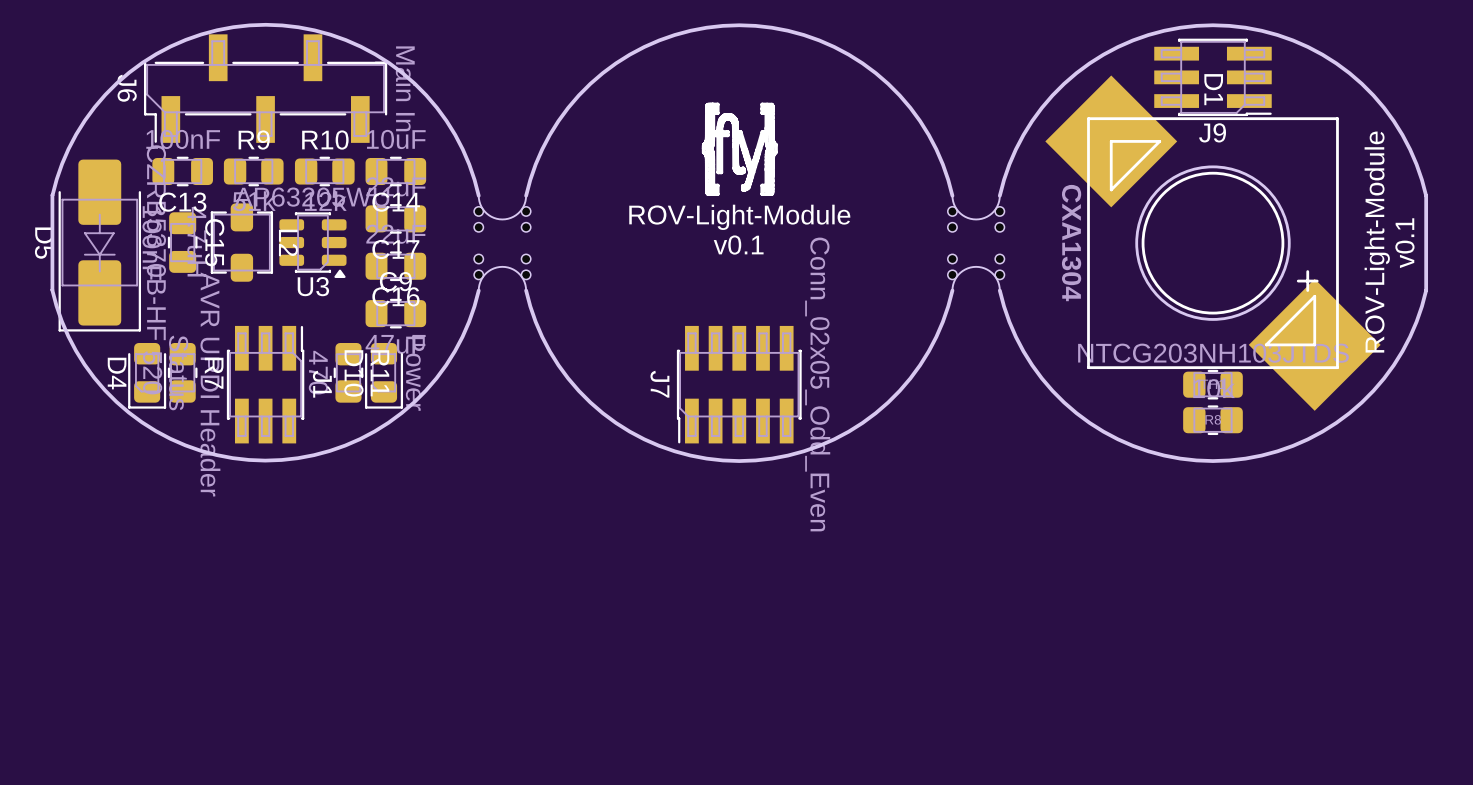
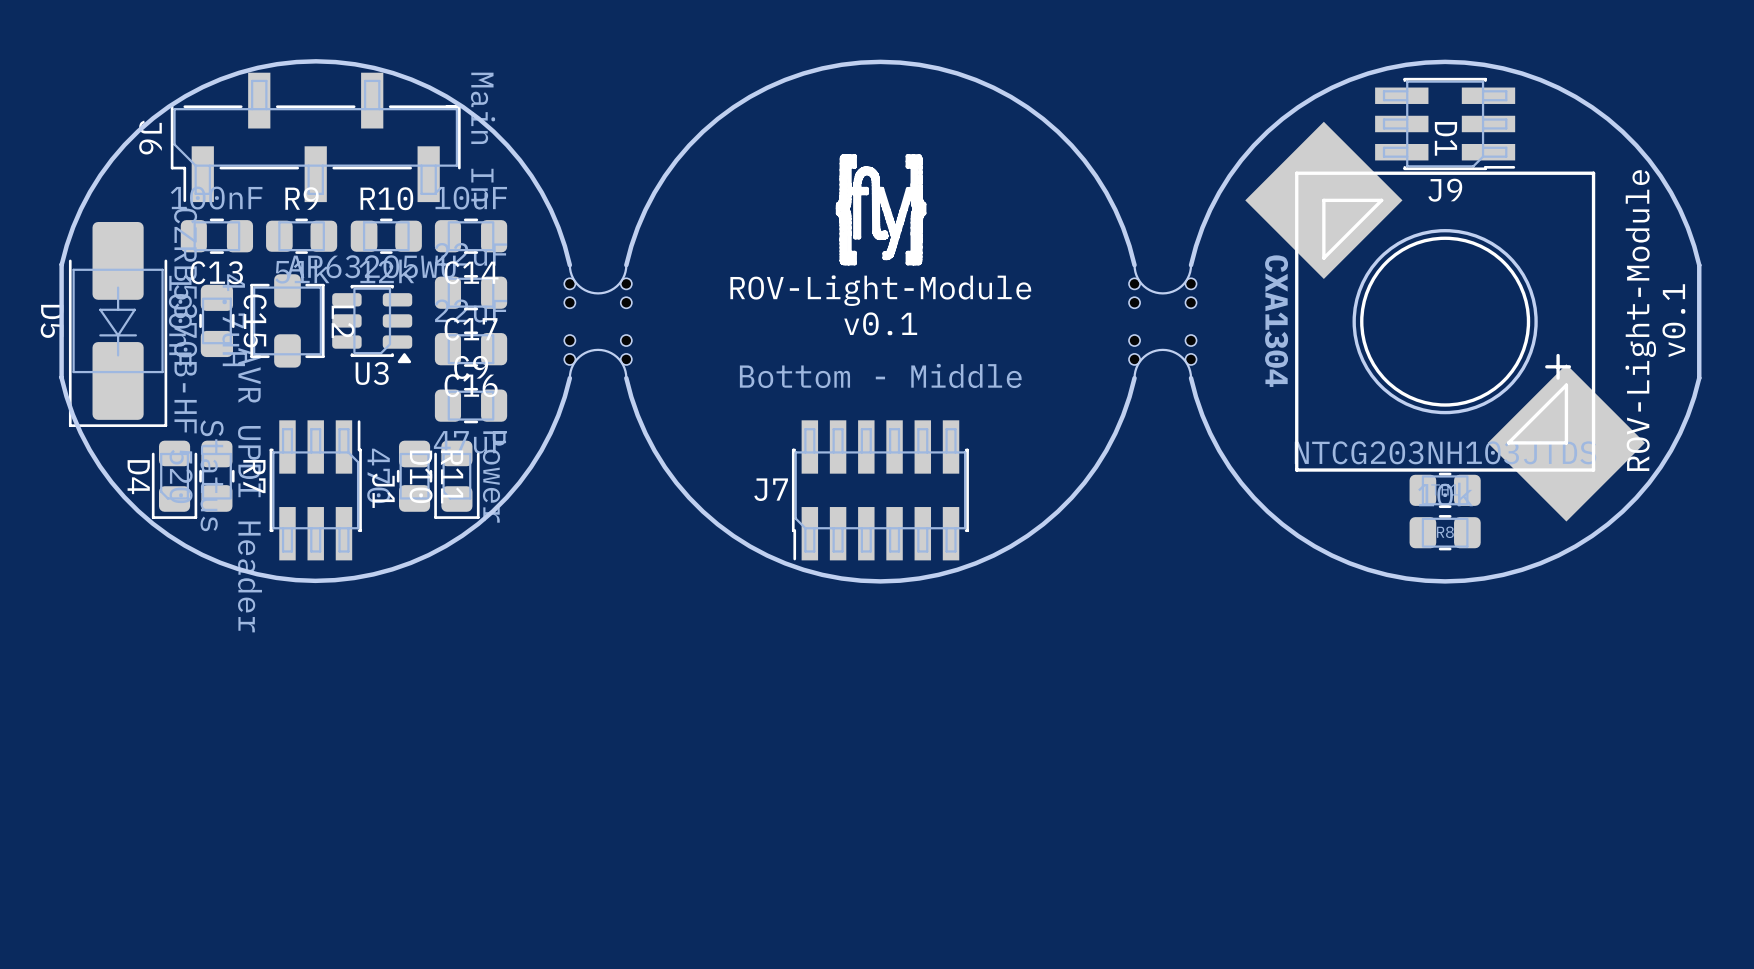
J7 footprint: [676, 325, 802, 444] -> [791, 420, 969, 561]
J7 name rotation: 0° (659, 384) -> 90° counterclockwise (771, 489)
J7 value: Conn_02x05_Odd_Even (817, 384) -> Bottom - Middle (880, 375)

